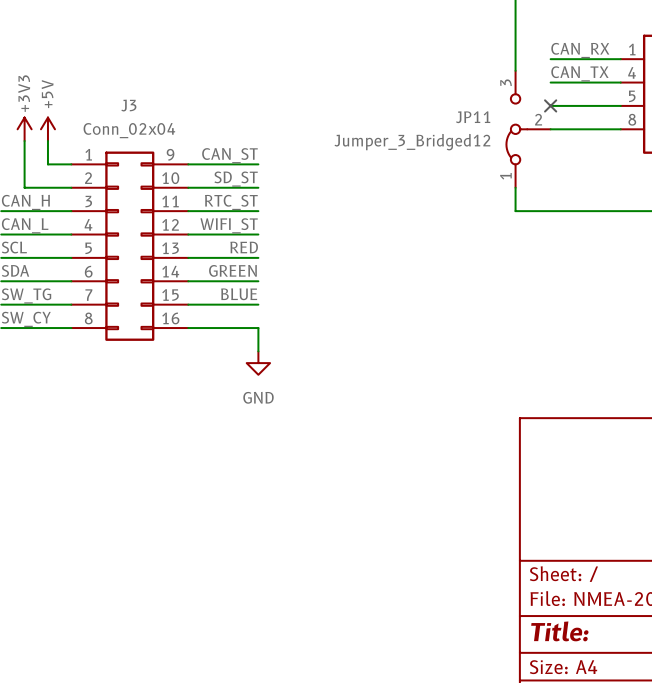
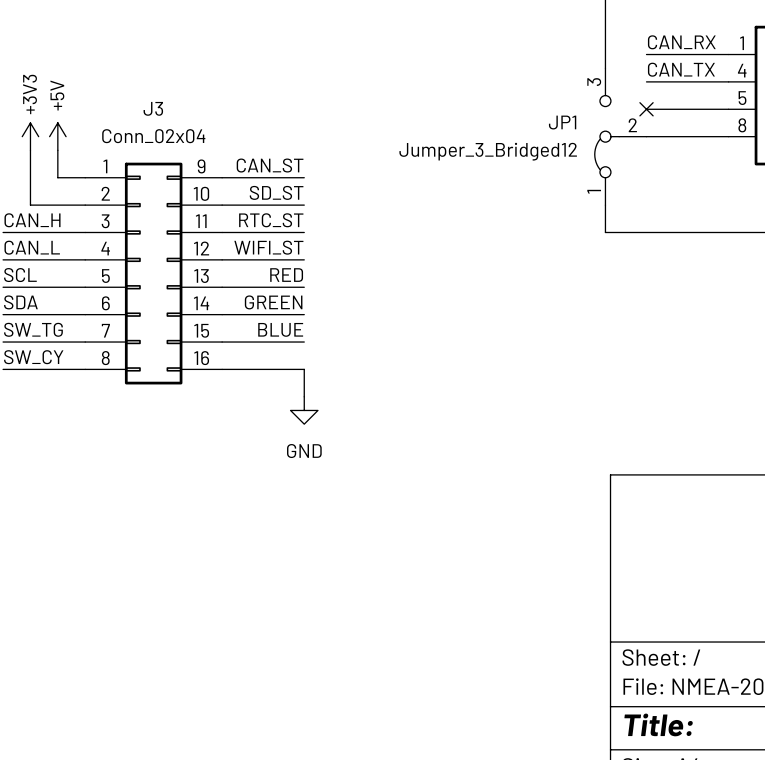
JP11 name: JP11 (473, 117) -> JP1 (562, 122)

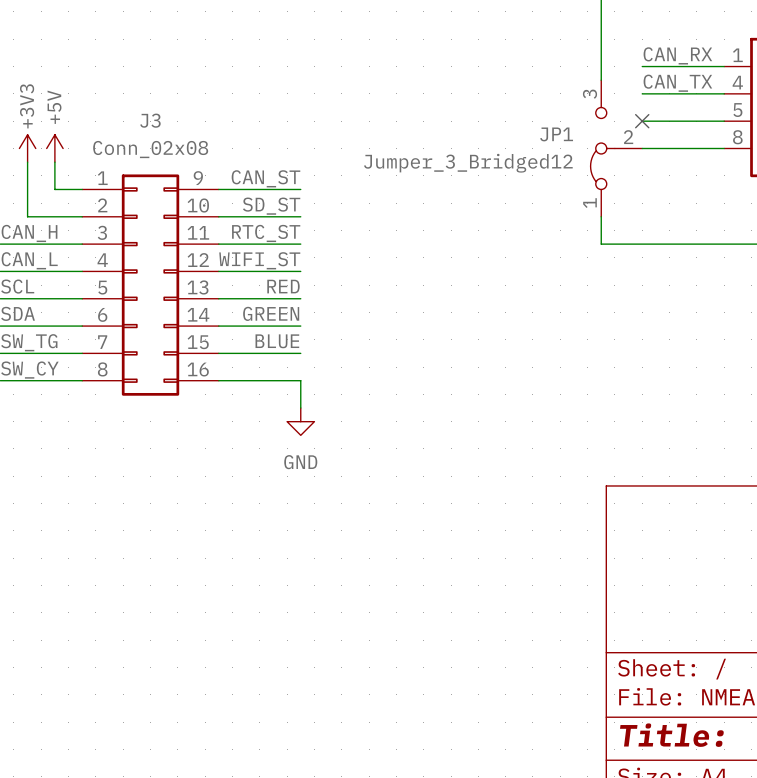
J3 value: Conn_02x04 (153, 136) -> Conn_02x08 (150, 149)

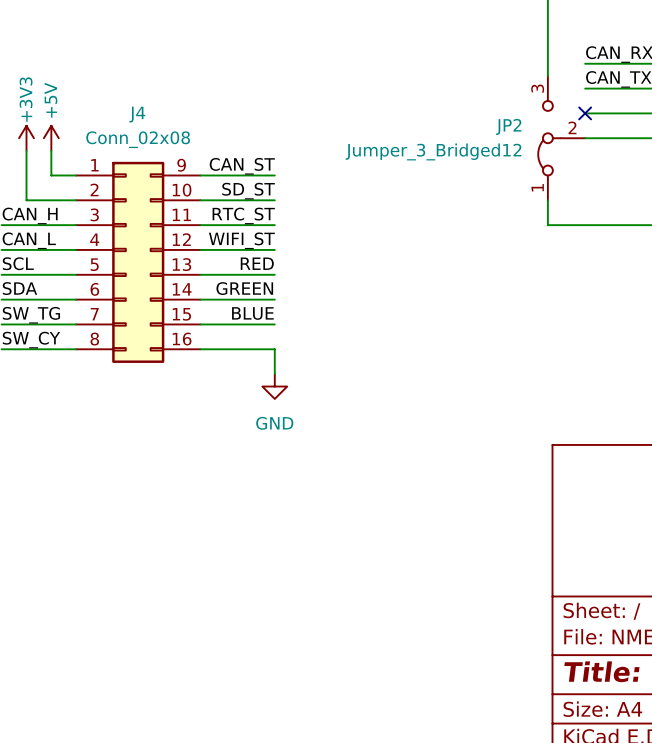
J3 name: J3 (150, 120) -> J4 (137, 114)
JP1 name: JP1 (556, 134) -> JP2 (508, 126)

